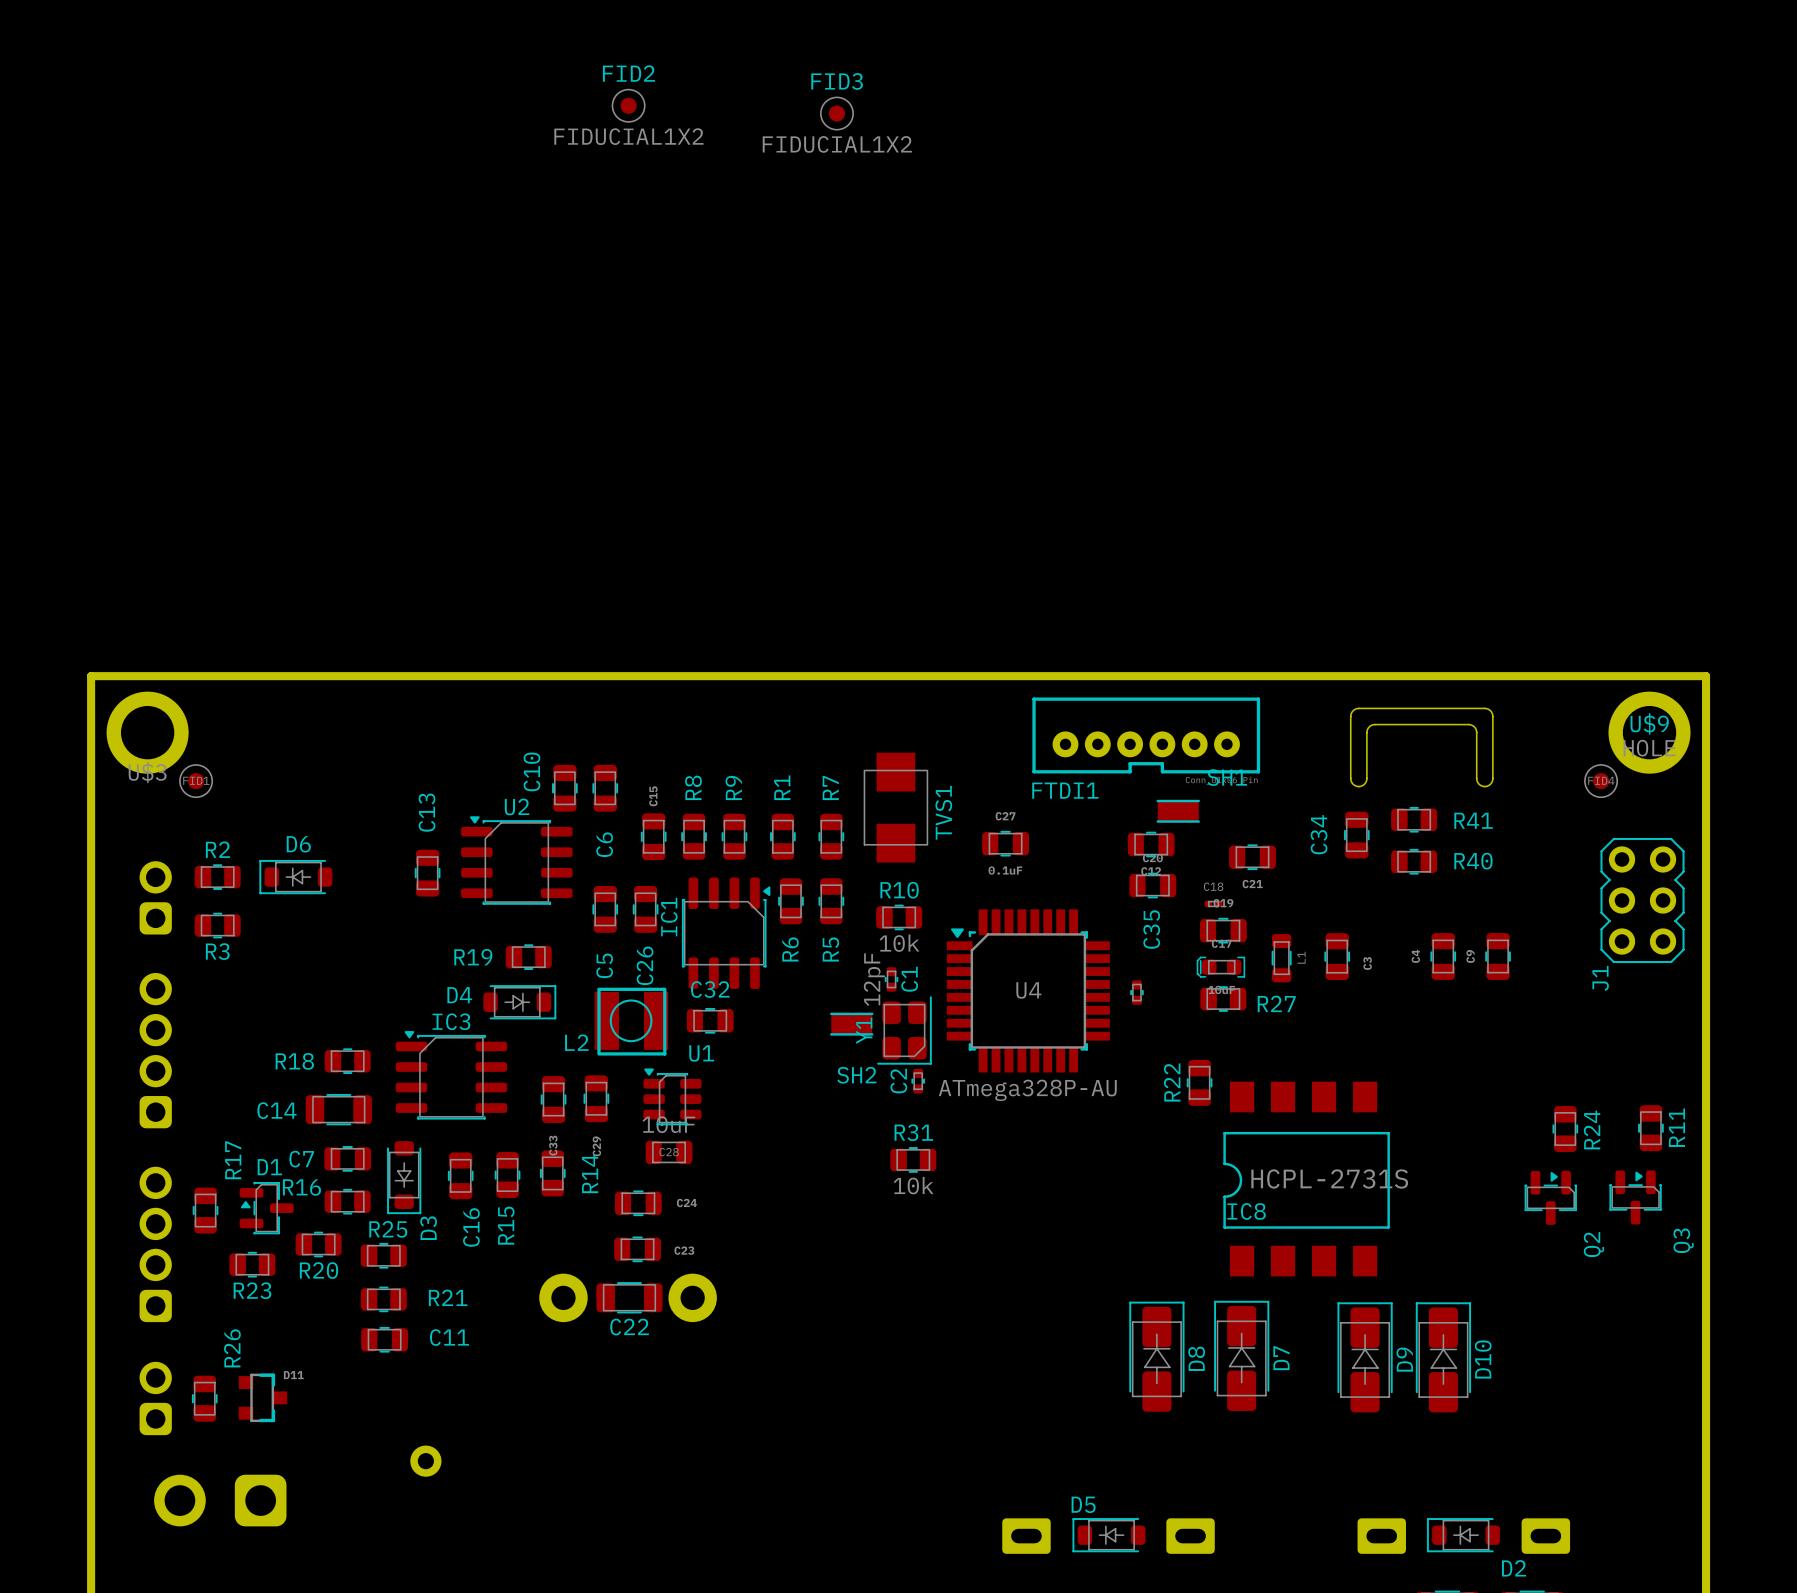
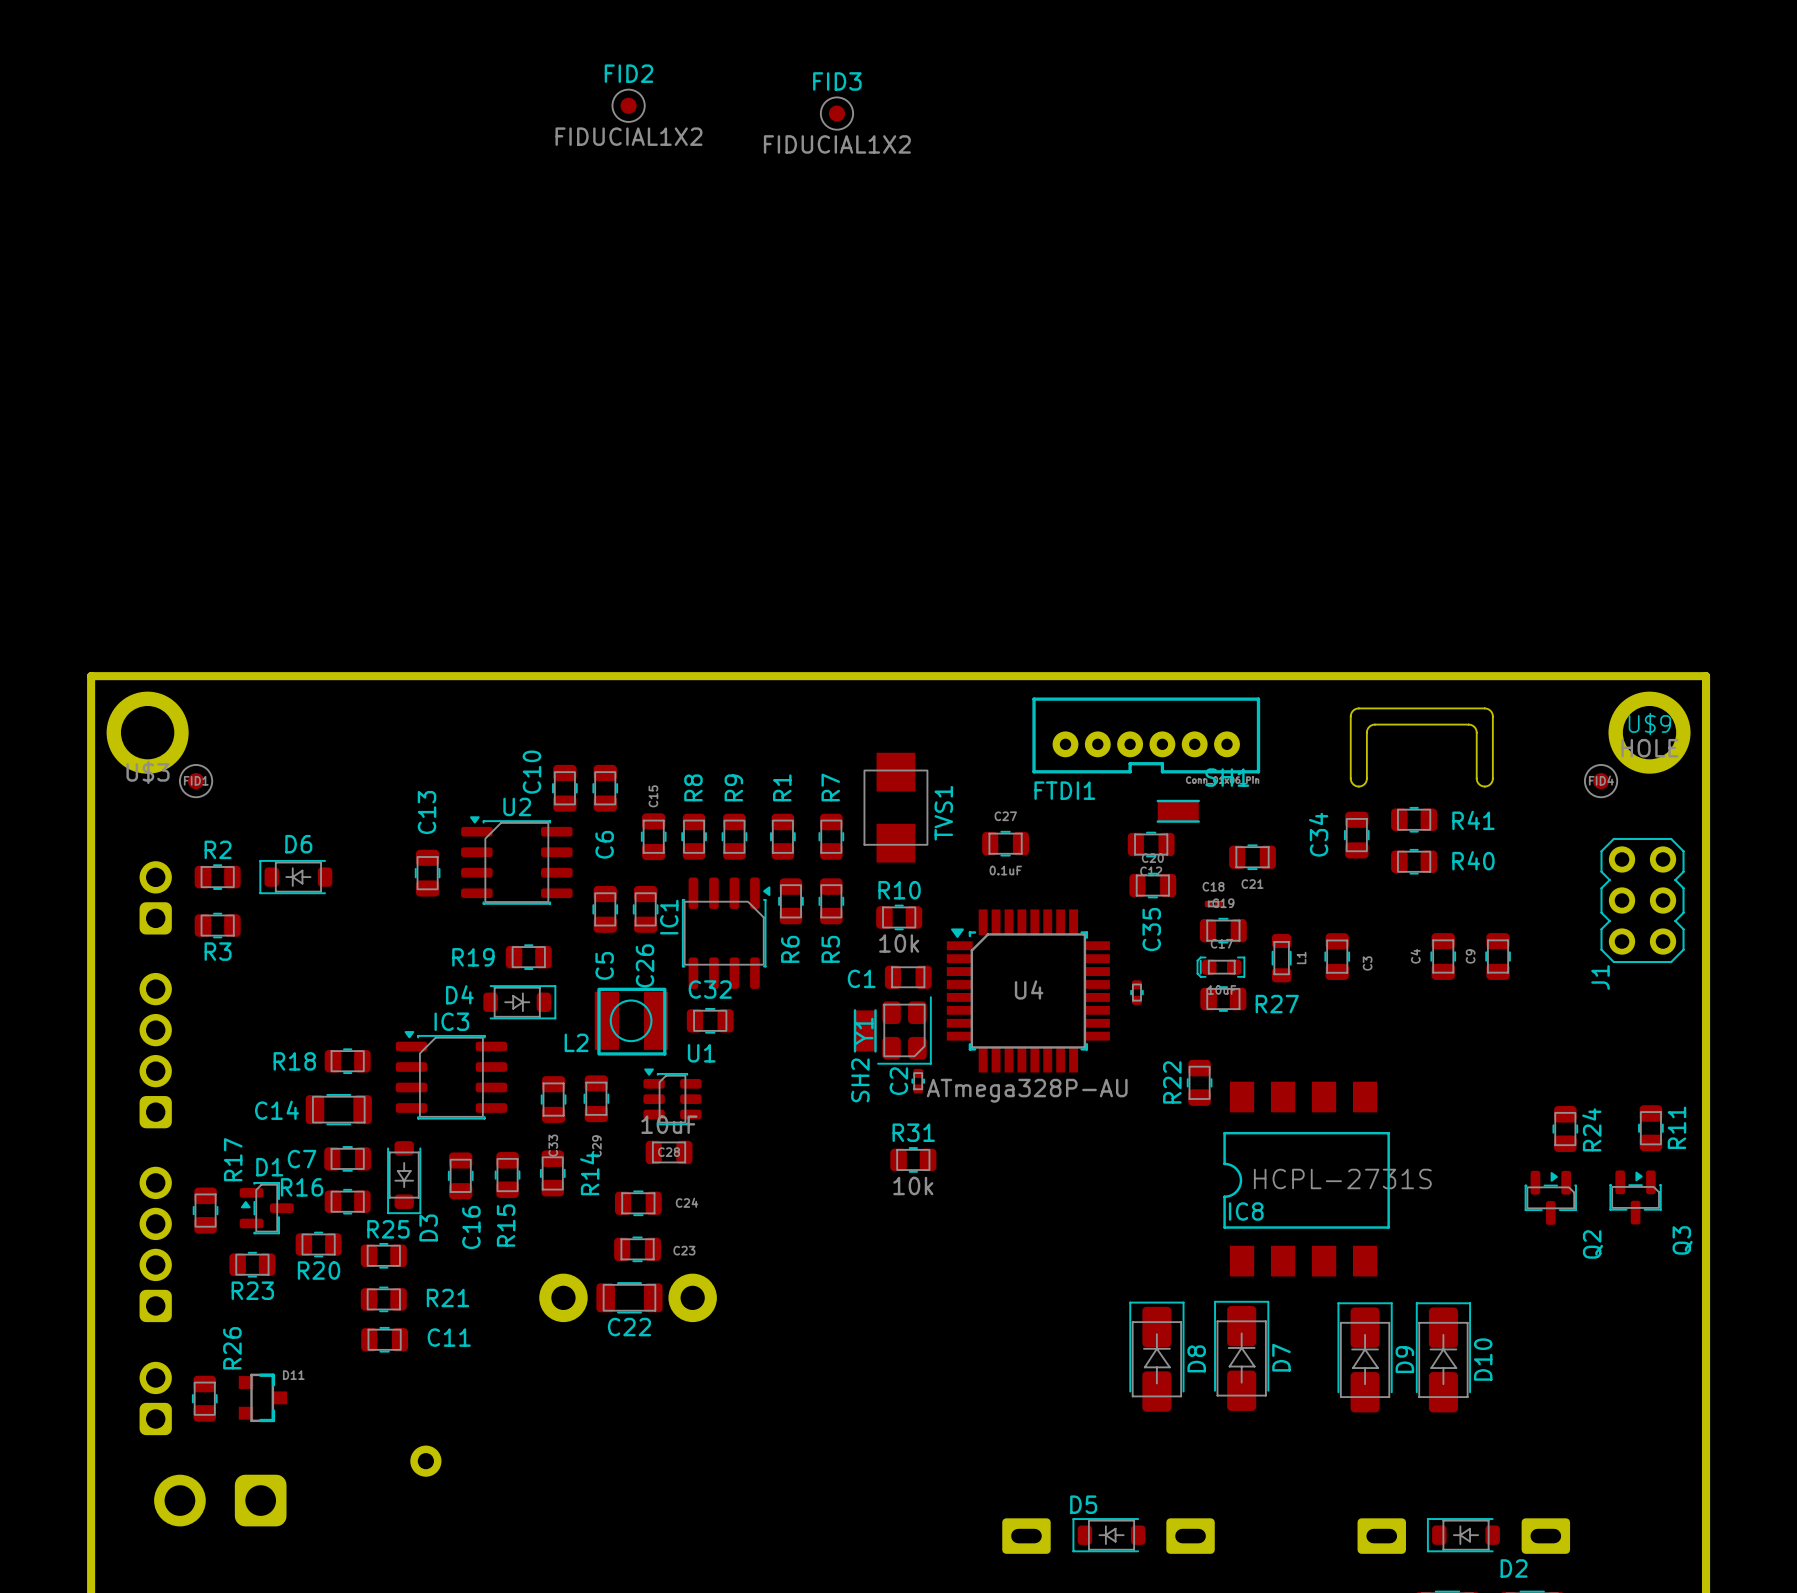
C1 footprint: [884, 967, 899, 992] -> [884, 965, 932, 989]
C1 value: 12pF (874, 979) -> none
C1 name position: C1 (909, 979) -> C1 (861, 978)
SH2 rotation: 0° (851, 1024) -> 90° clockwise (865, 1030)

